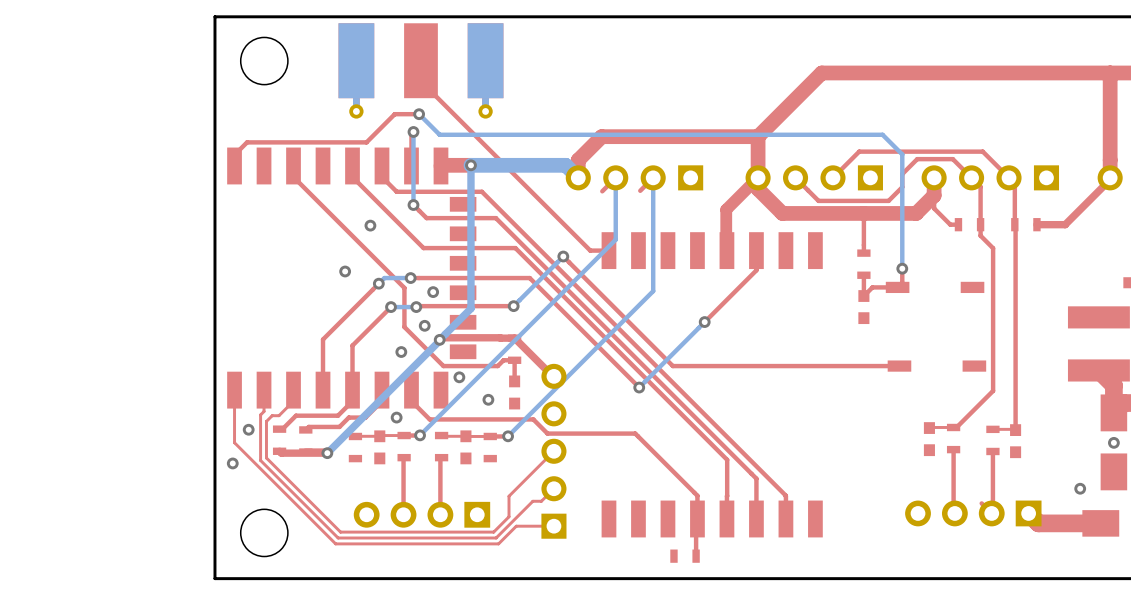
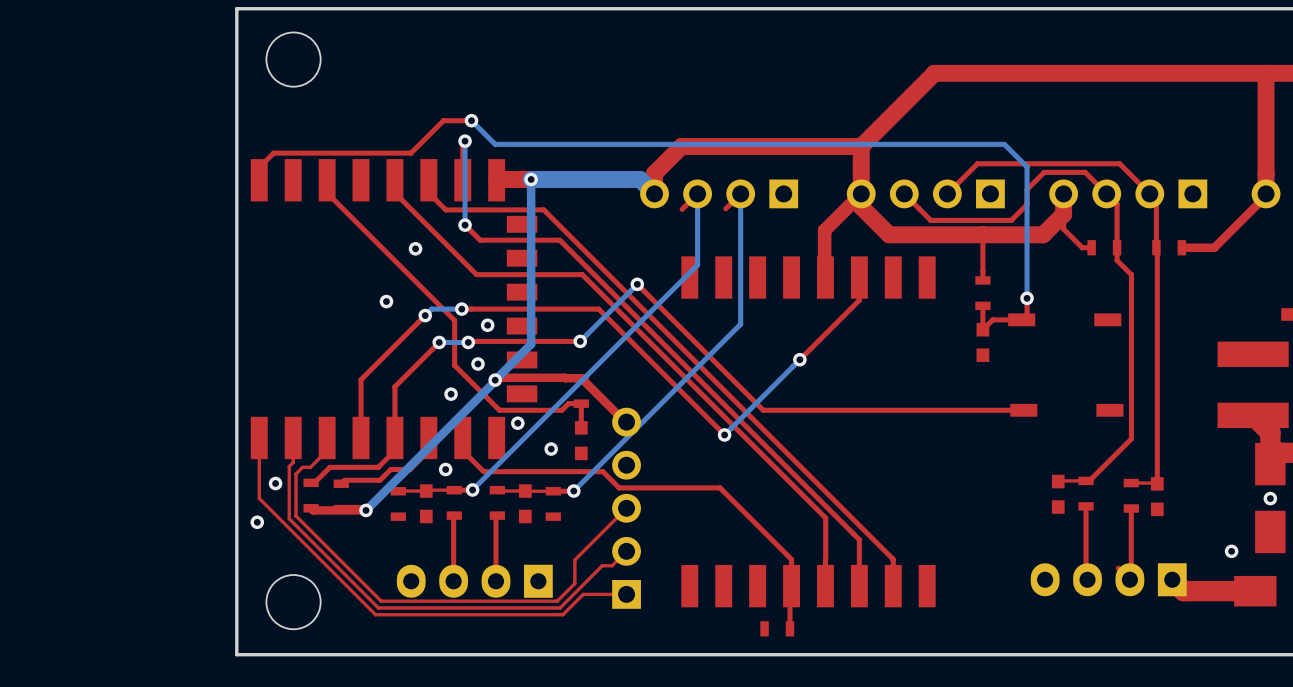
top track: (420, 60) (420, 81) (590, 250) (608, 250) -> none
part: (420, 70) -> none
part footprint: [905, 500, 1042, 527] -> [1030, 563, 1187, 597]
part footprint: [353, 501, 491, 528] -> [396, 564, 553, 598]

